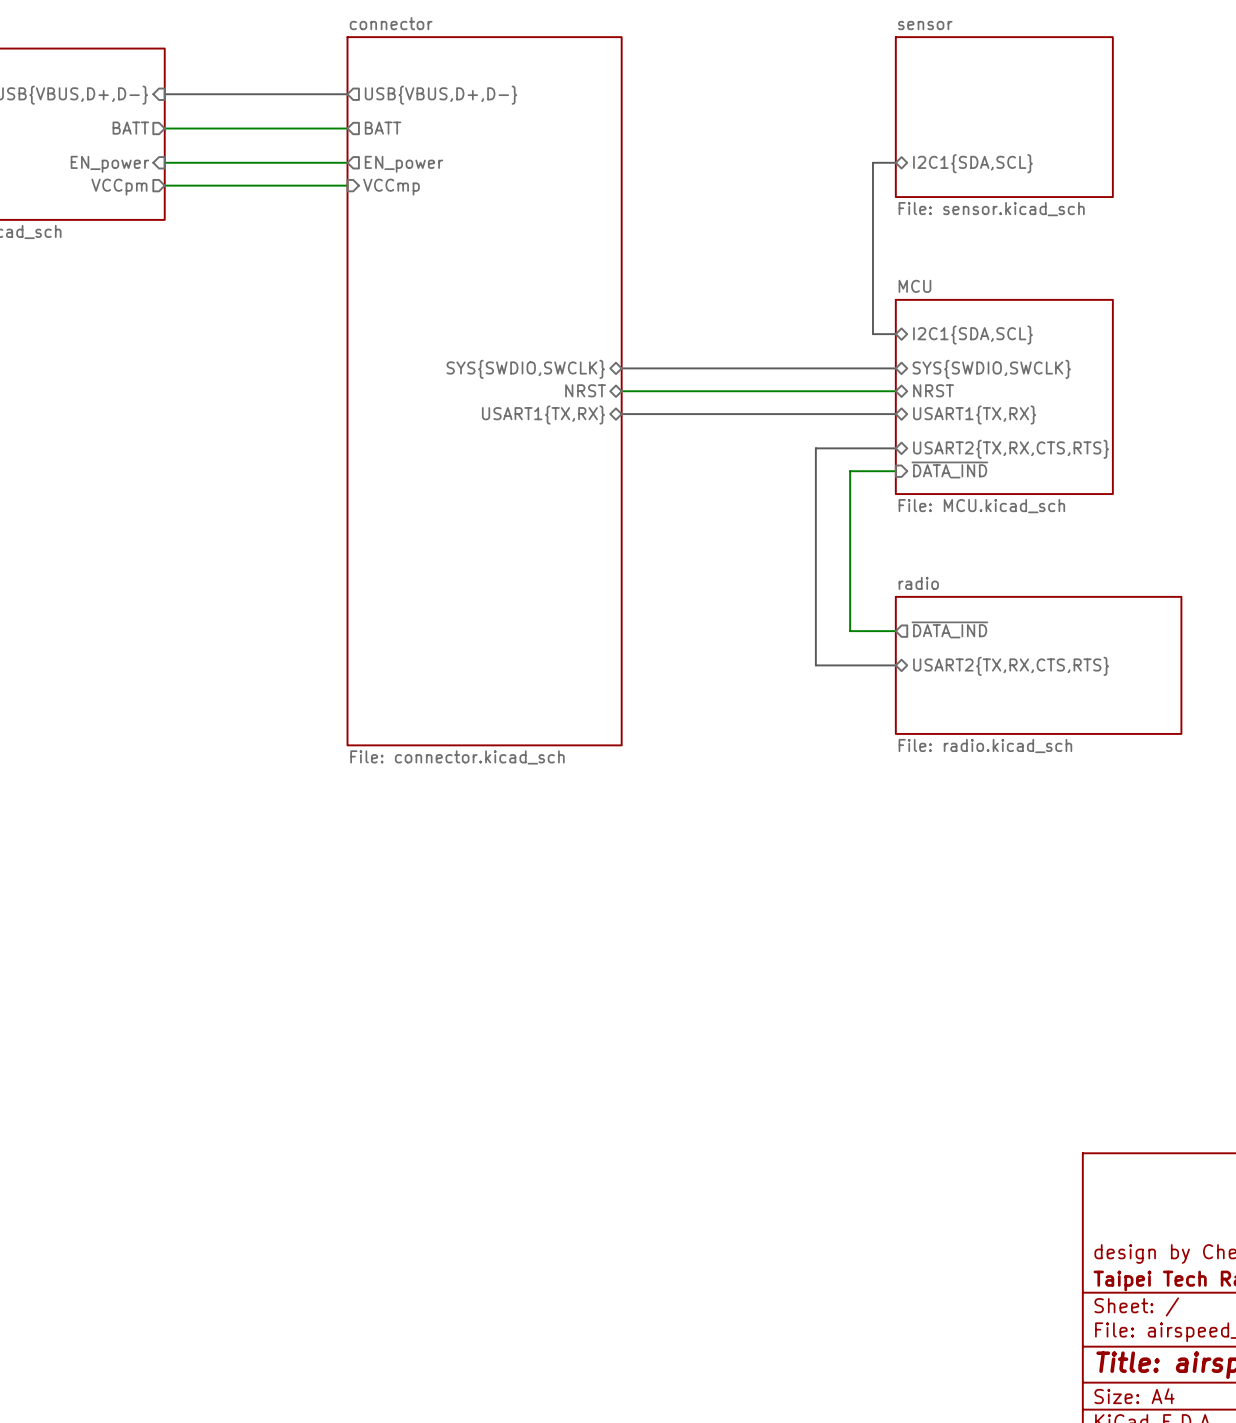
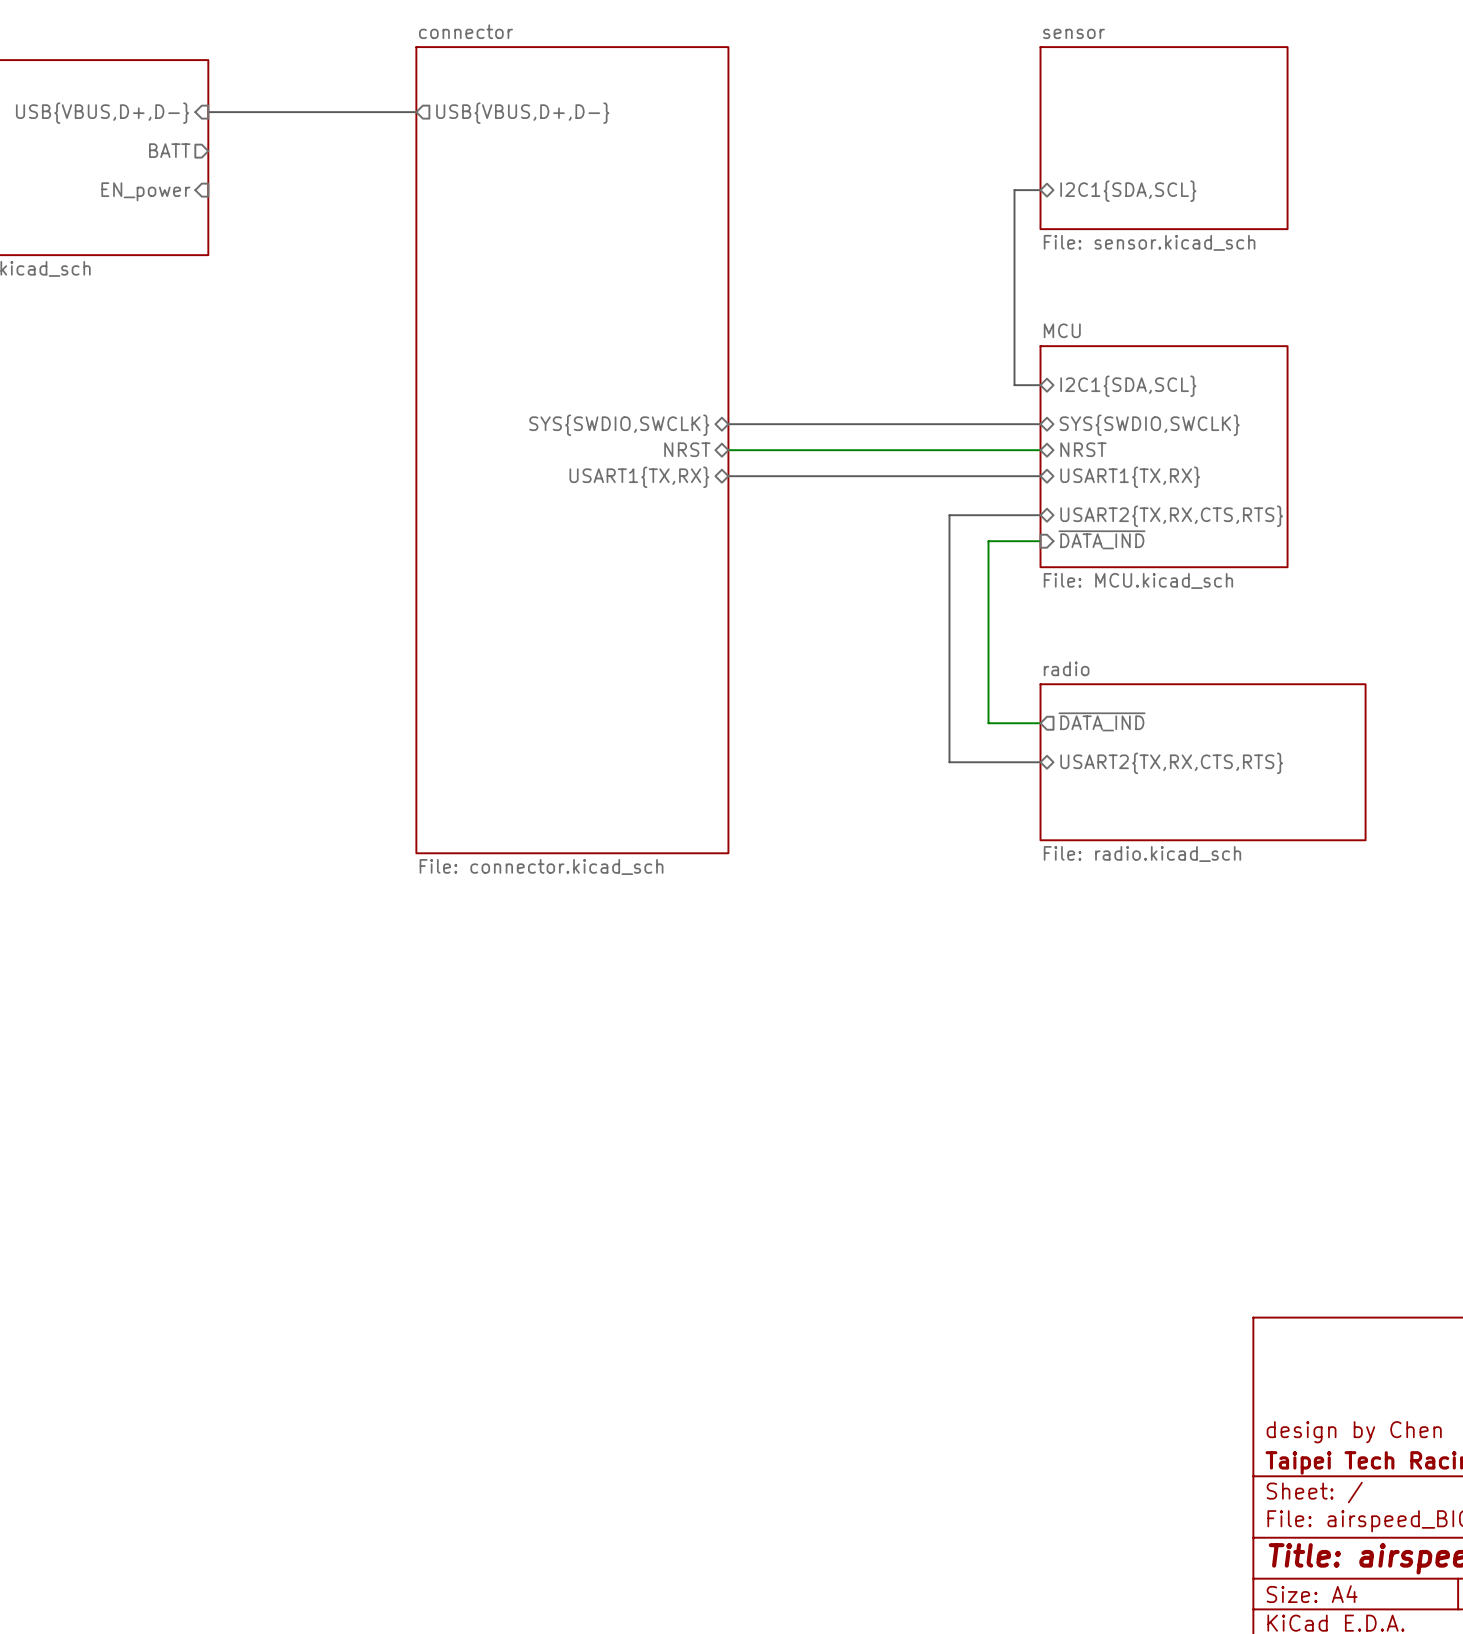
wire: (164, 128) (347, 128) -> none
sheet pin: BATT (383, 128) -> none
wire: (164, 162) (347, 162) -> none
sheet pin: EN_power (403, 164) -> none
wire: (164, 185) (347, 185) -> none
sheet pin: VCCpm (119, 187) -> none
sheet pin: VCCmp (391, 187) -> none

